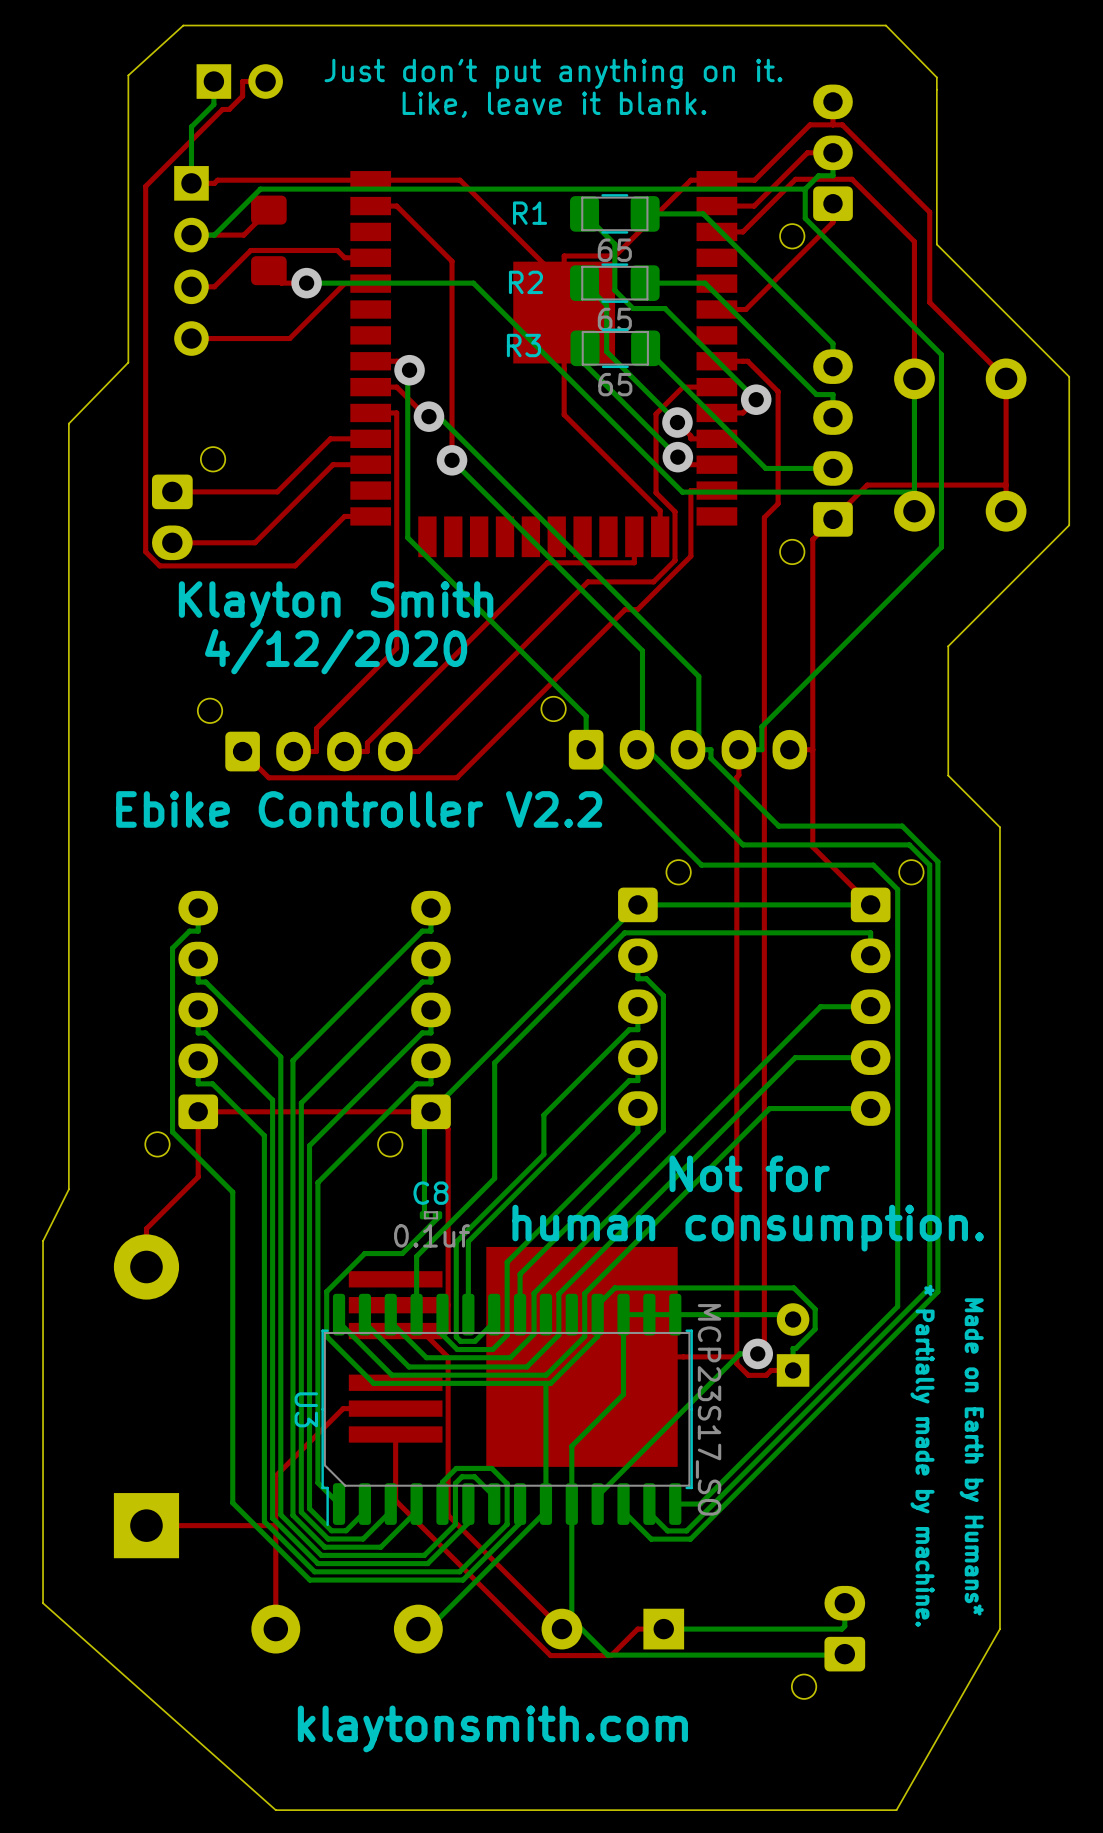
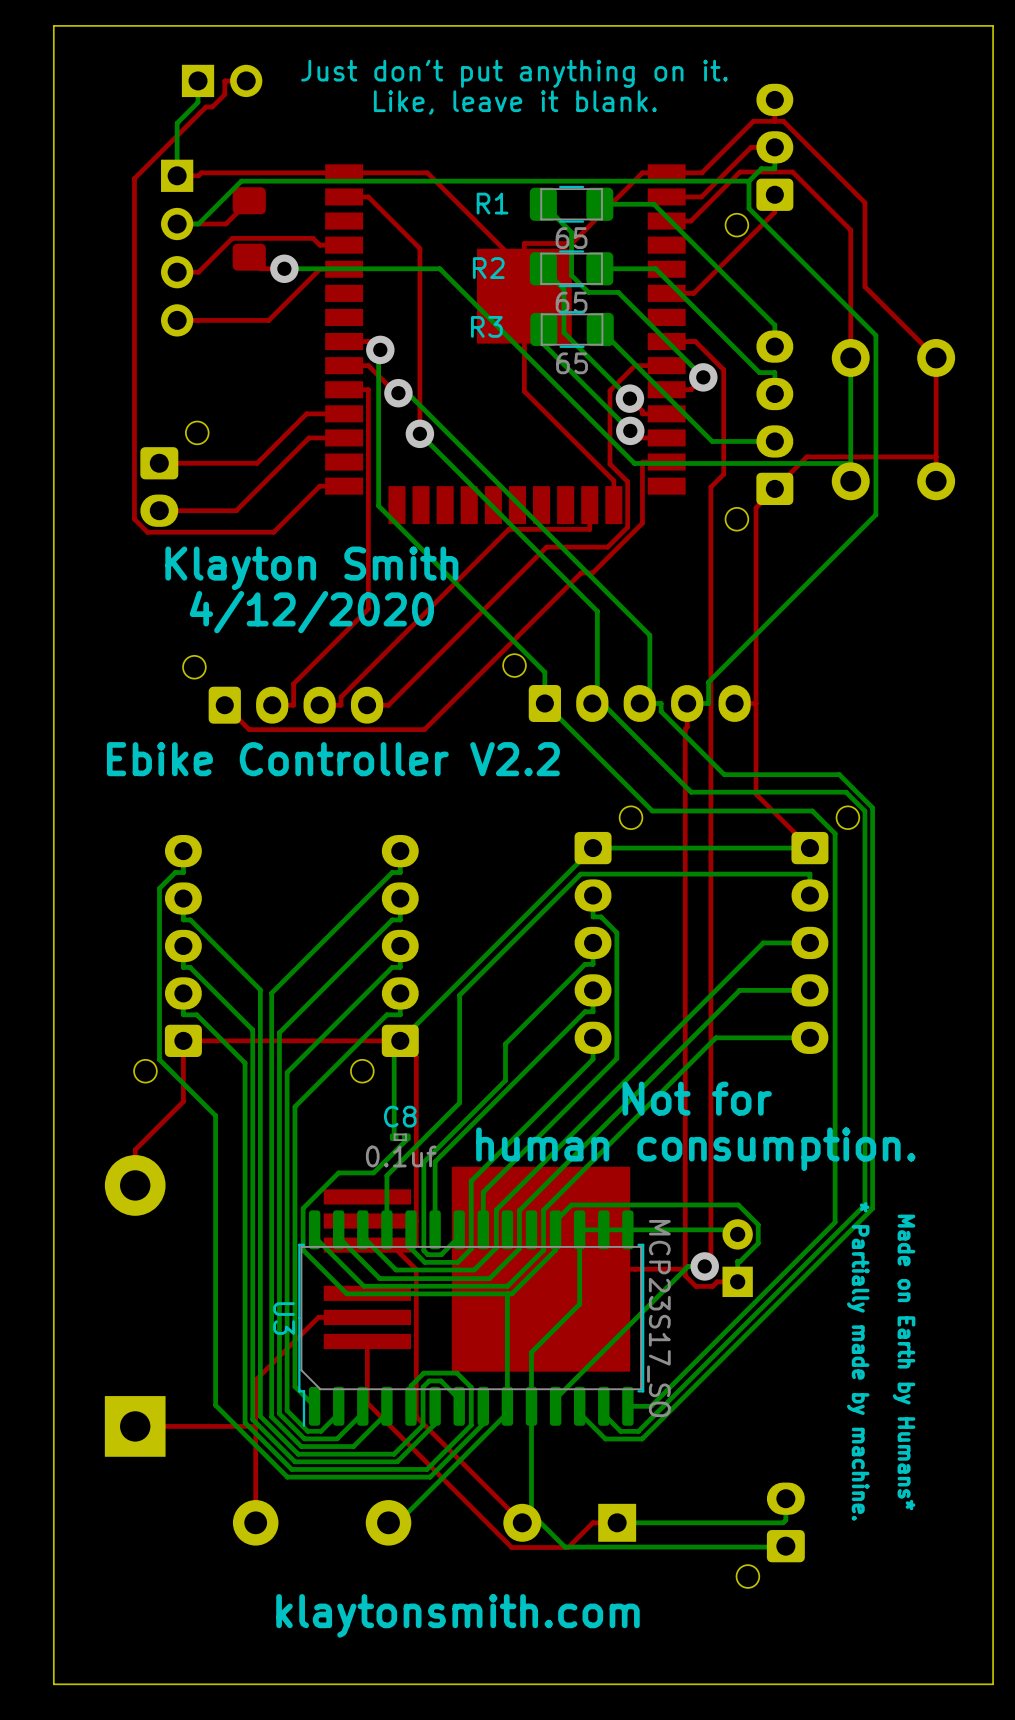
board edge: (885, 25) (936, 77) (936, 244) (1069, 376) (1069, 525) (948, 646) (948, 775) (999, 827) (999, 1629) (896, 1810) (275, 1810) (43, 1603) (43, 1241) (68, 1189) (68, 423) (128, 362) (128, 75) (183, 25) (885, 25) -> (993, 25) (993, 1684) (53, 1684) (53, 25) (993, 25)

